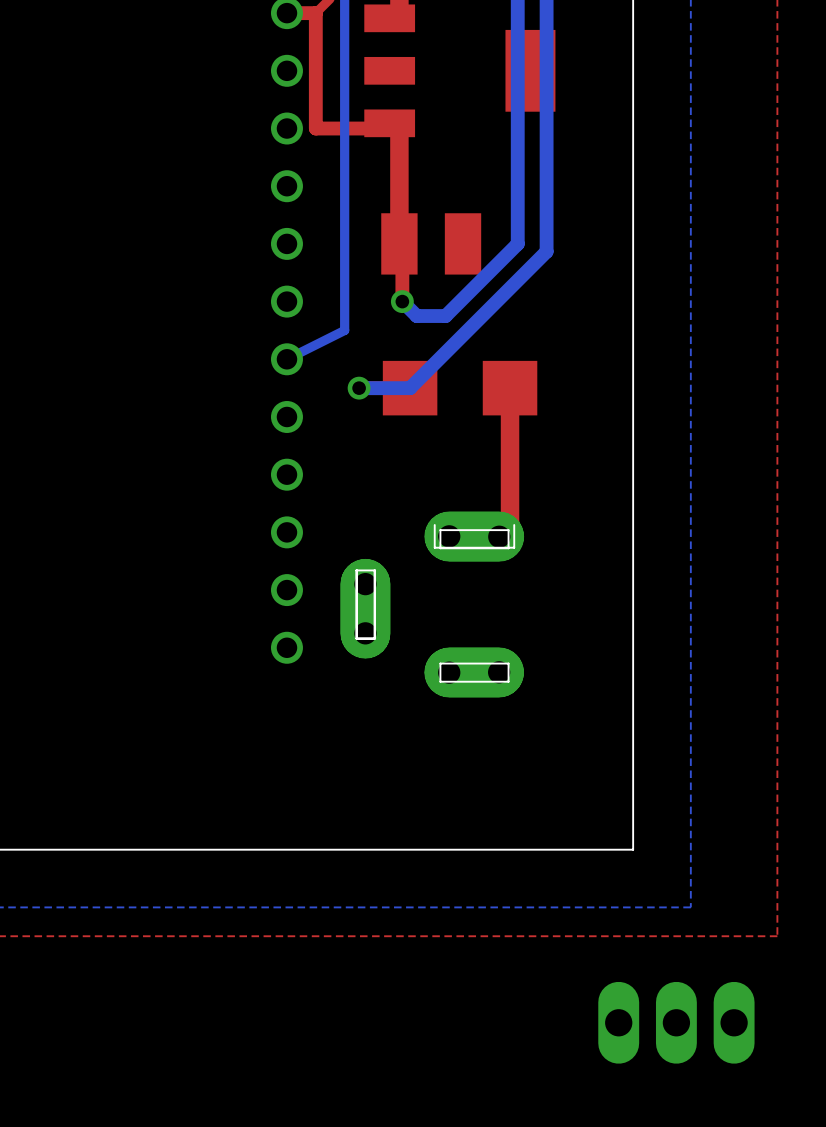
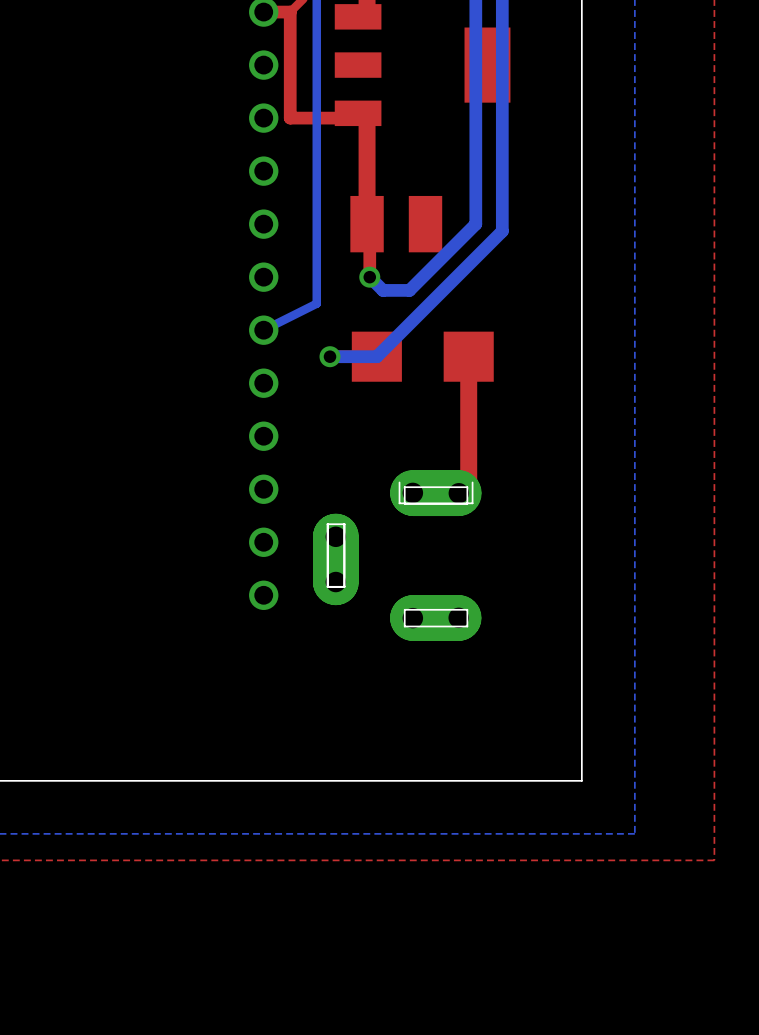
part: (676, 1022) -> none

